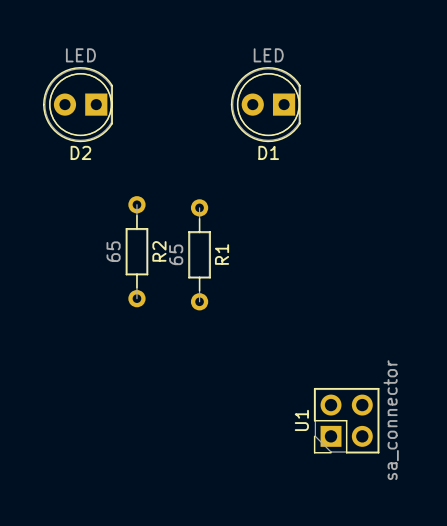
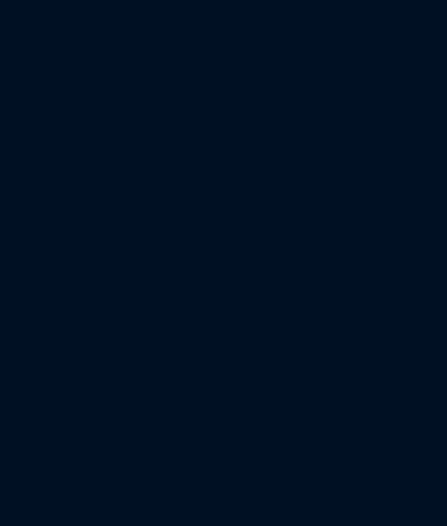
D2: LED (77, 104) -> none
D1: LED (265, 104) -> none
R2: 65 (136, 251) -> none
R1: 65 (199, 254) -> none
U1: sa_connector (346, 420) -> none

